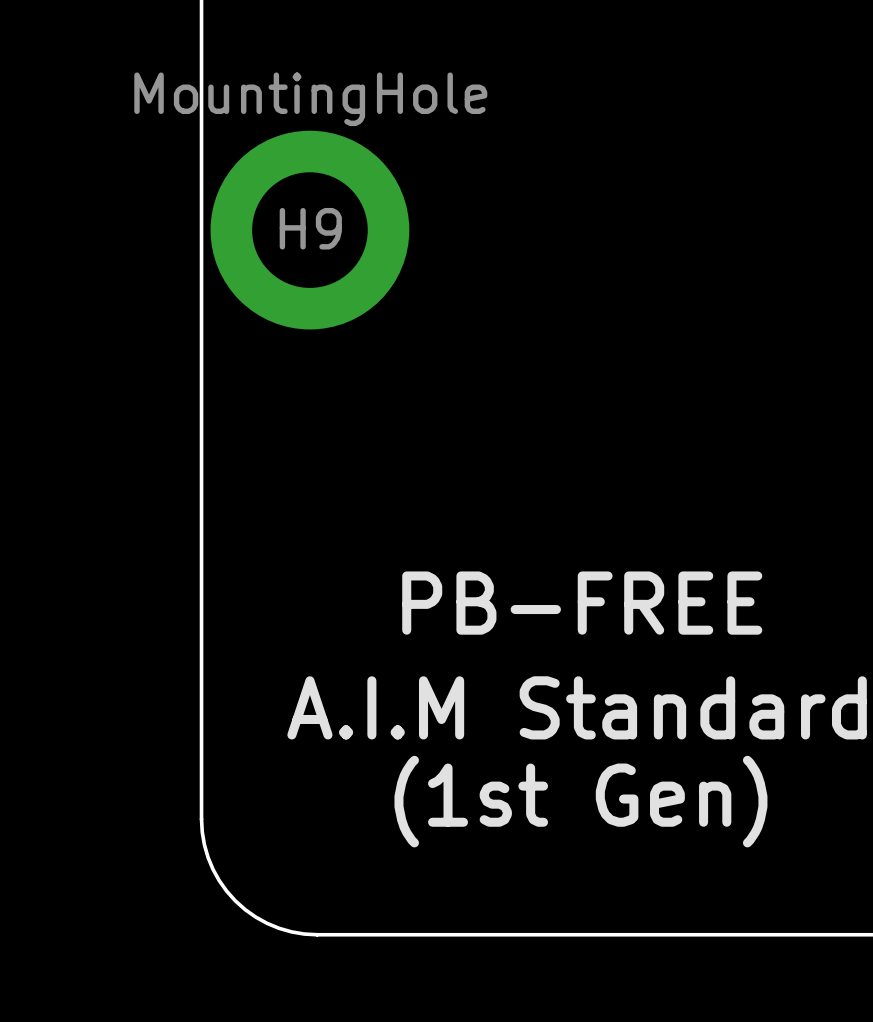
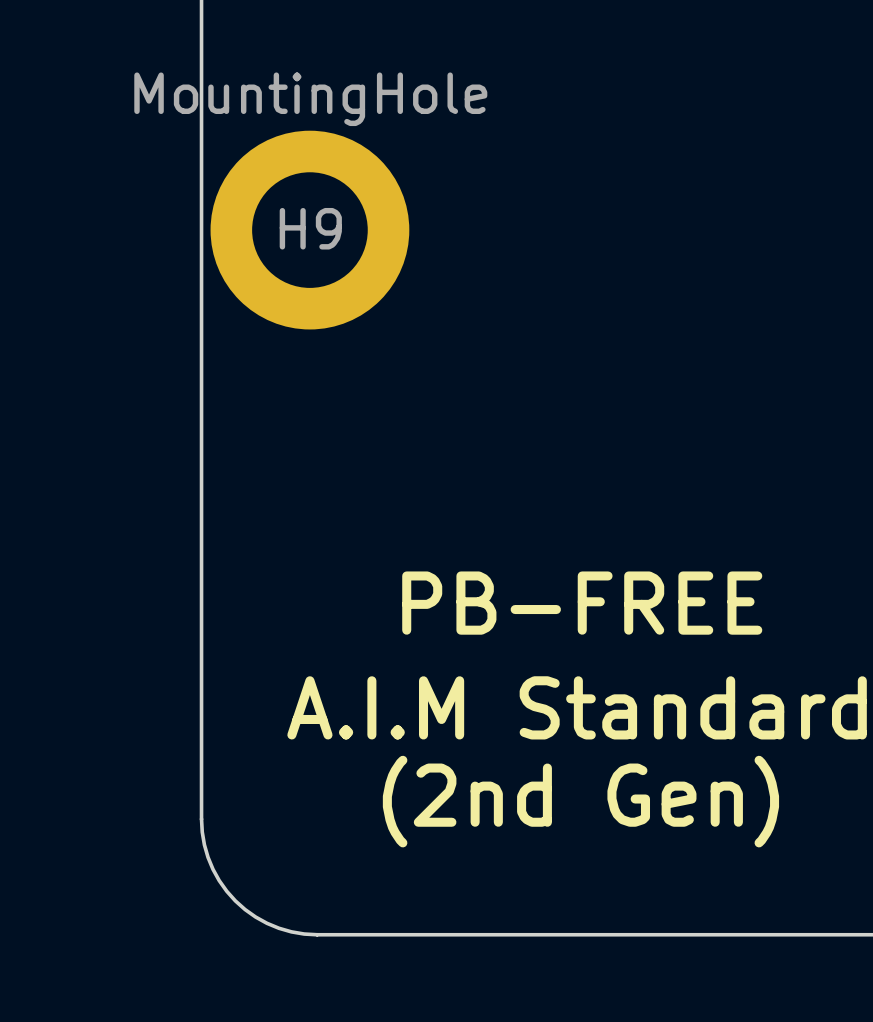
text: (1st Gen) (580, 801) -> (2nd Gen) (580, 801)

